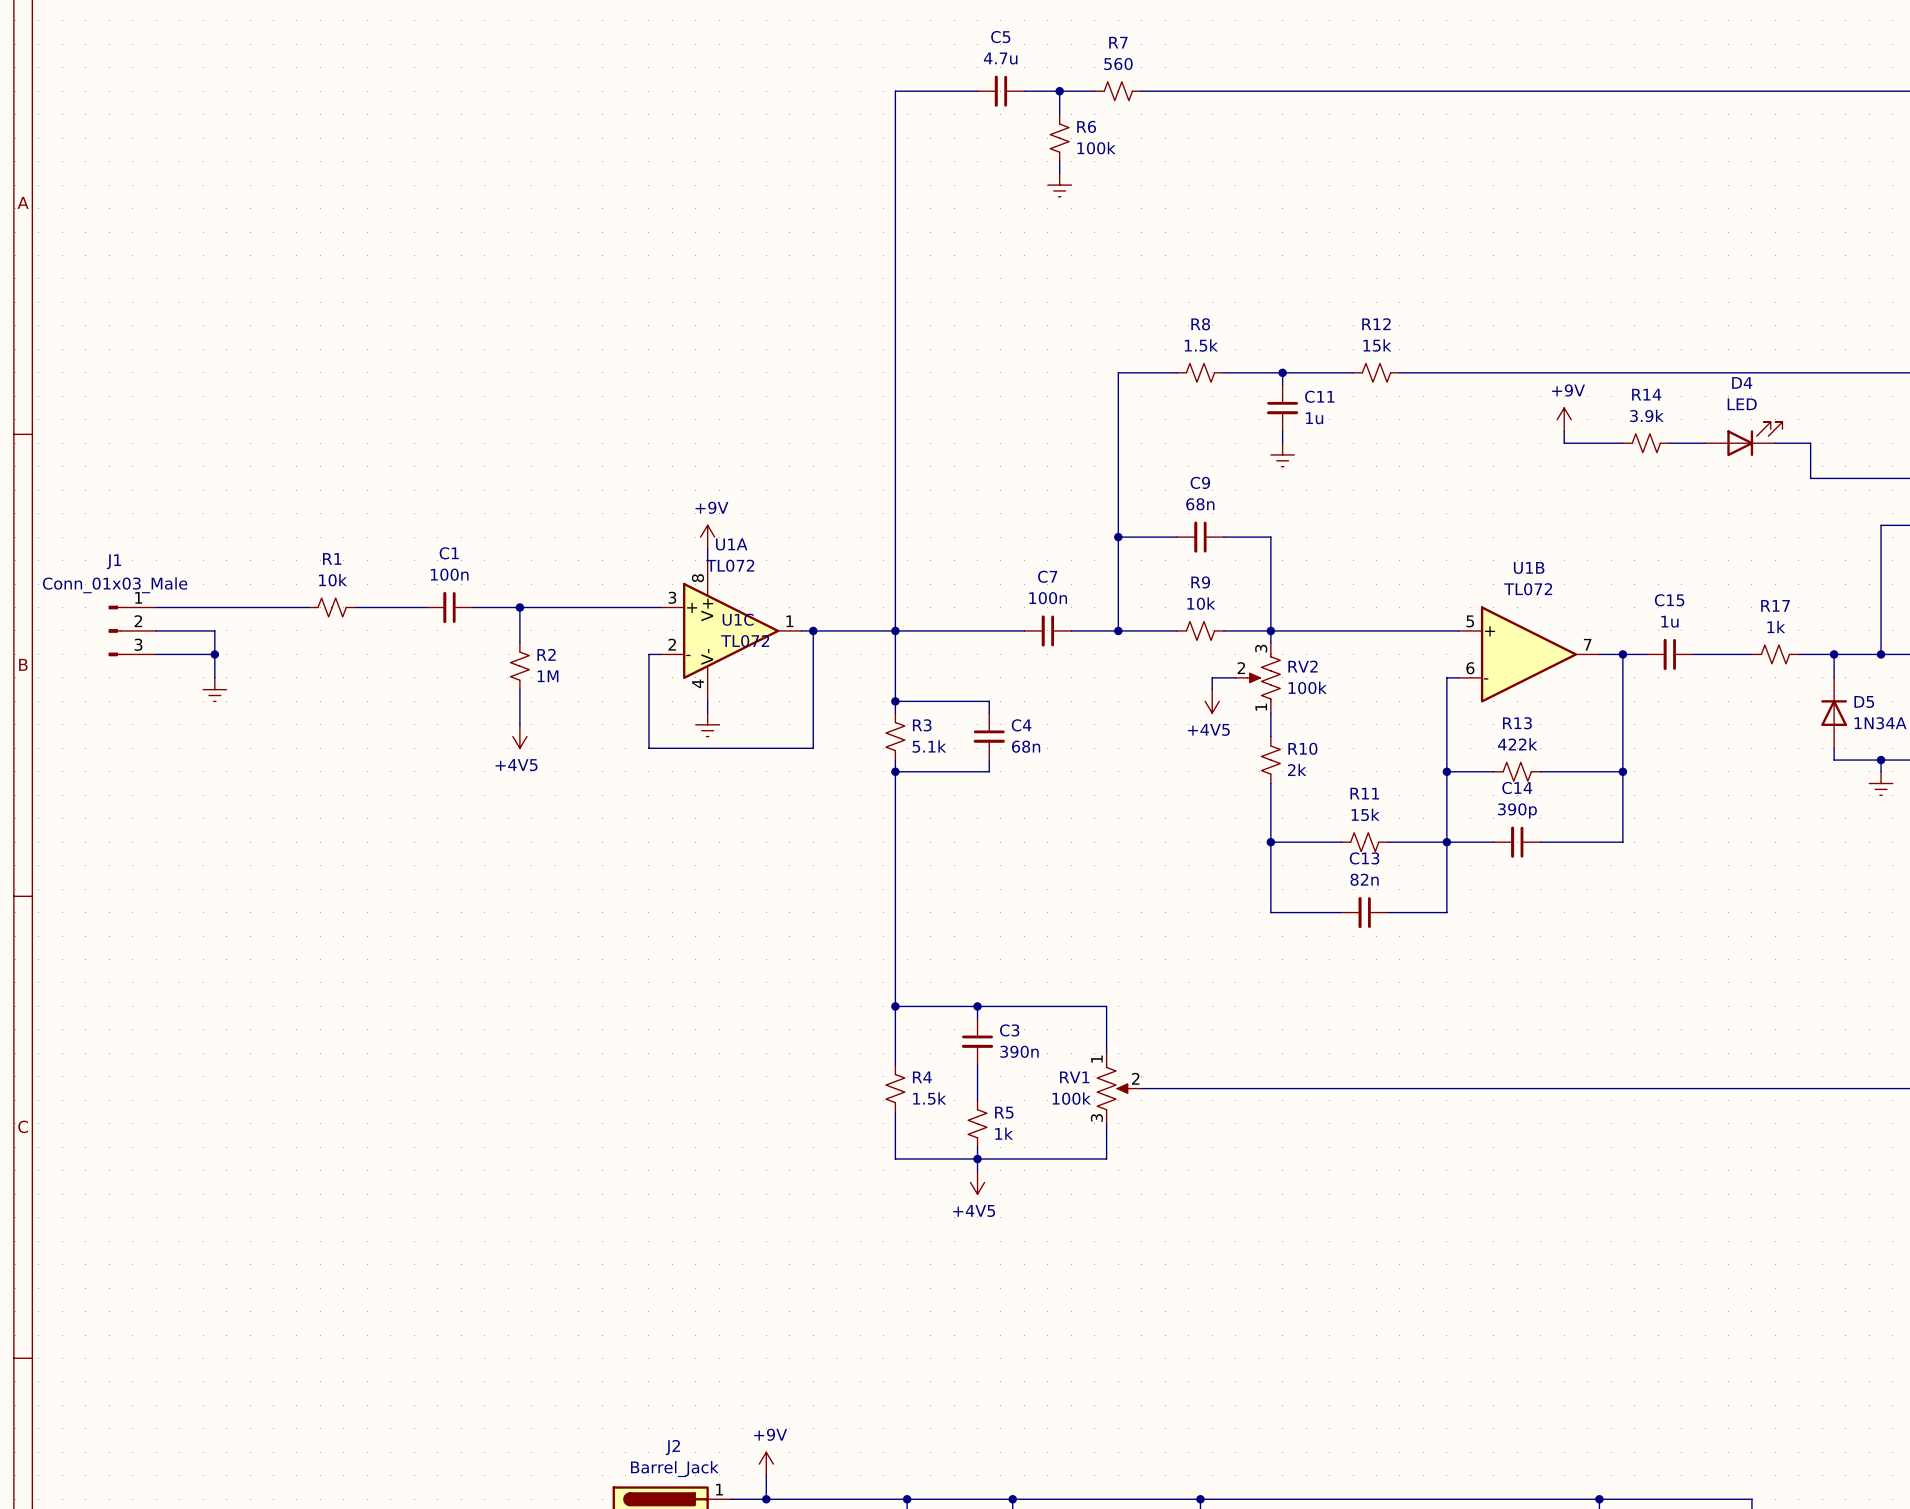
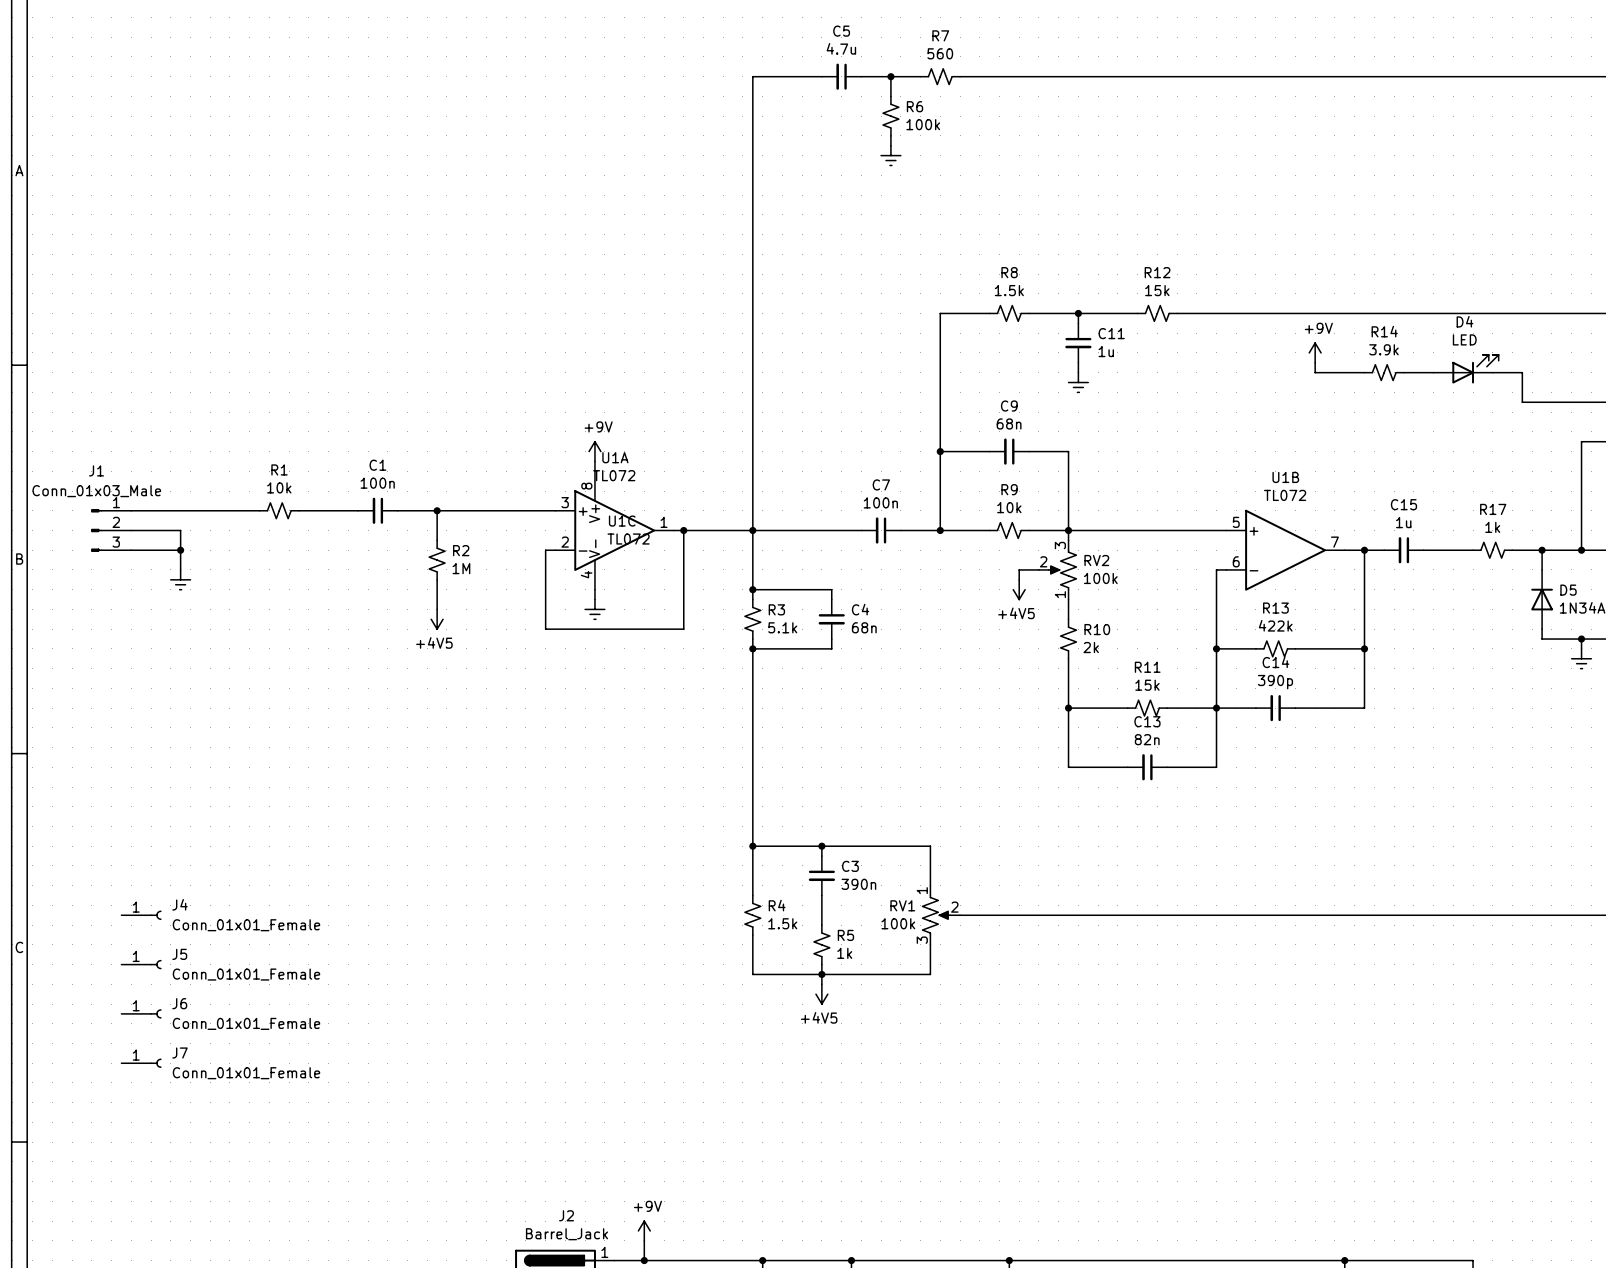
J4: none -> Conn_01x01_Female (141, 915)
J5: none -> Conn_01x01_Female (141, 964)
J6: none -> Conn_01x01_Female (141, 1013)
J7: none -> Conn_01x01_Female (141, 1063)

